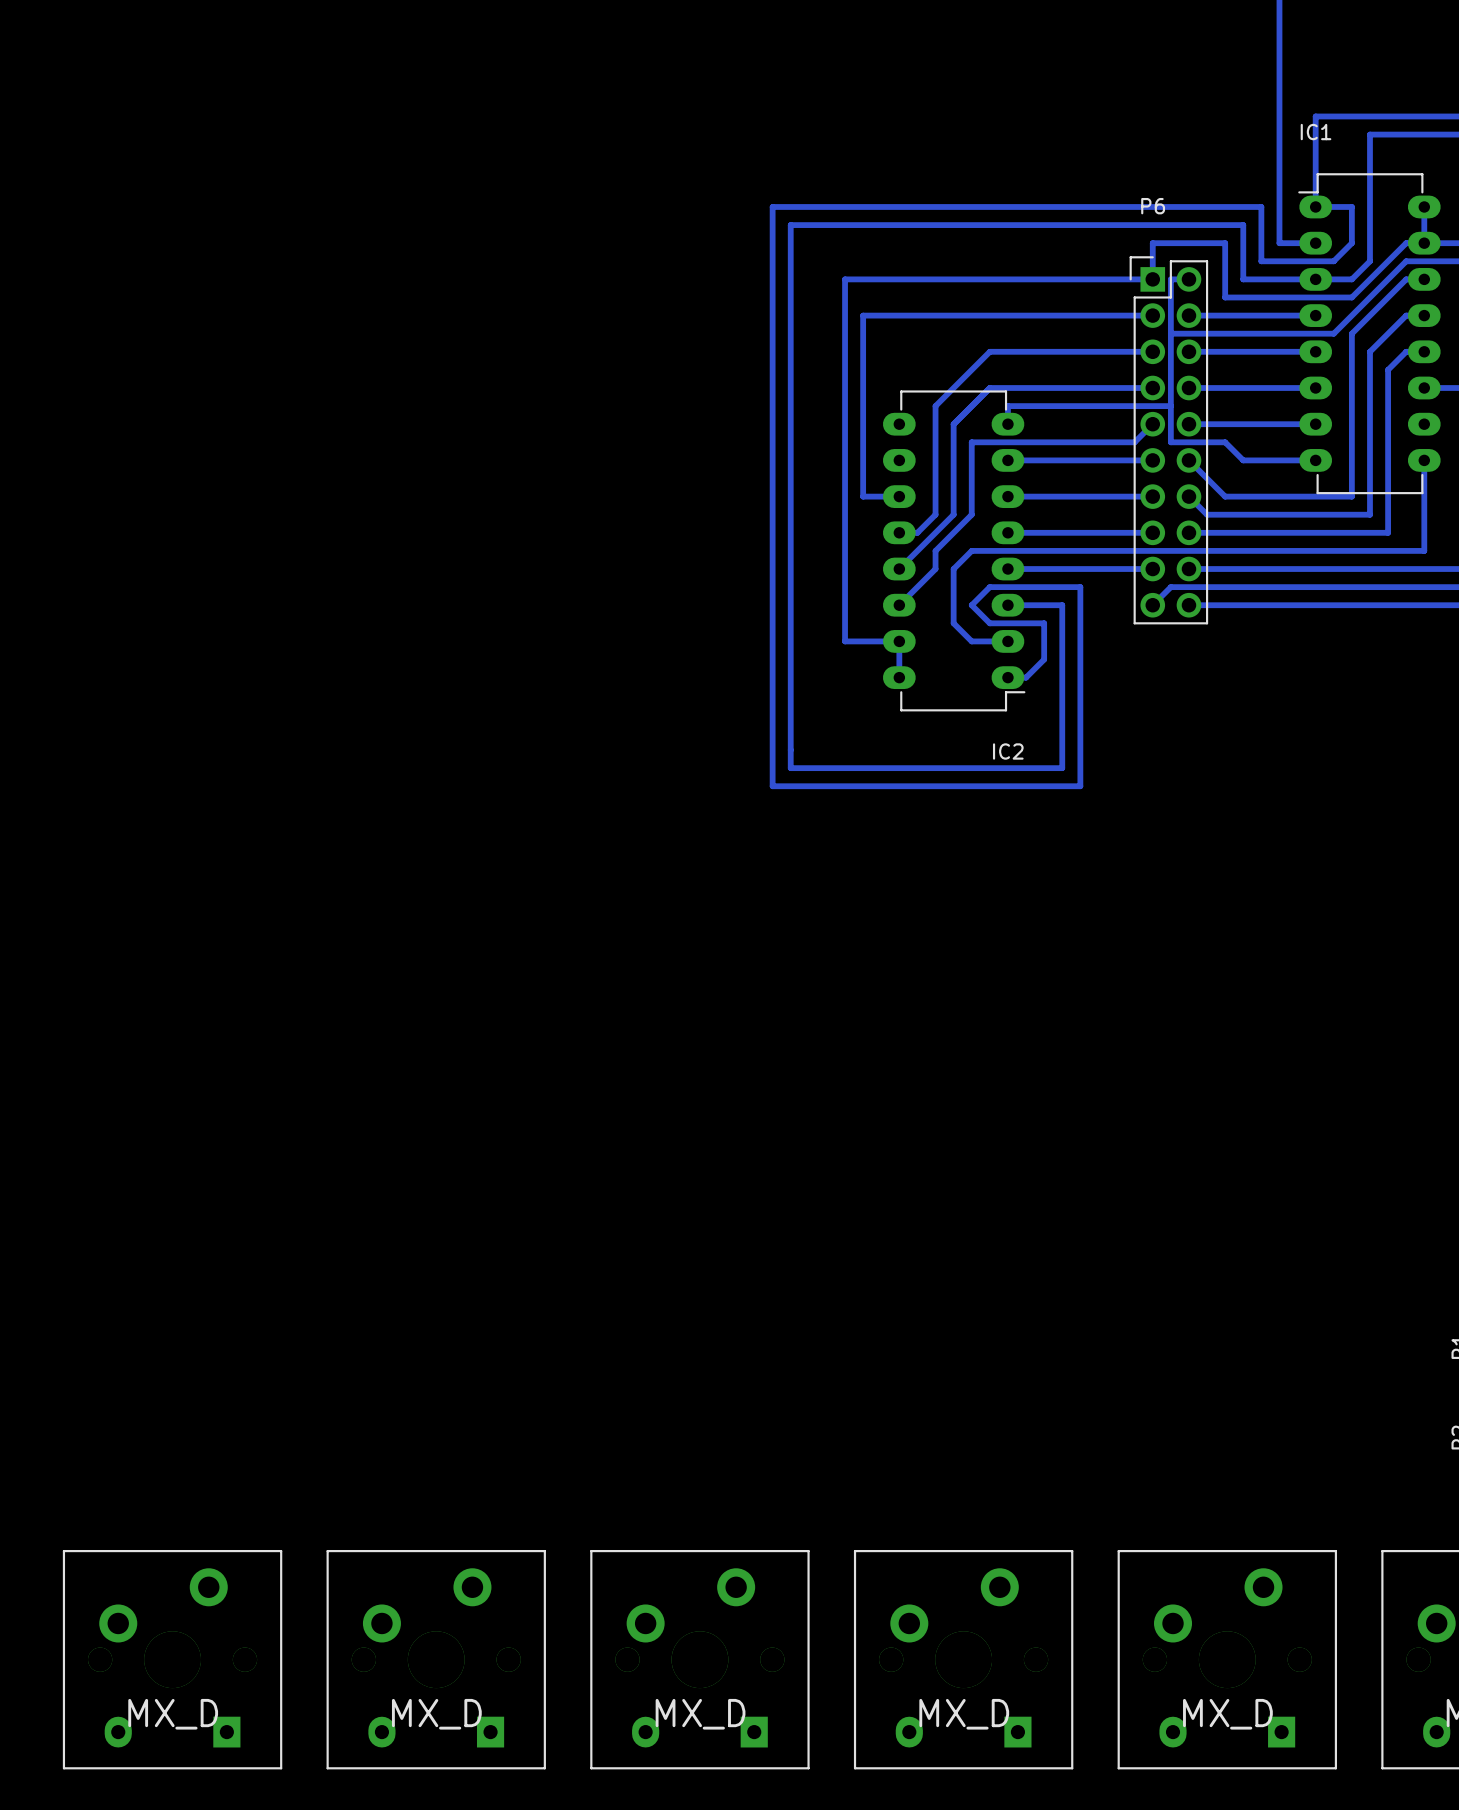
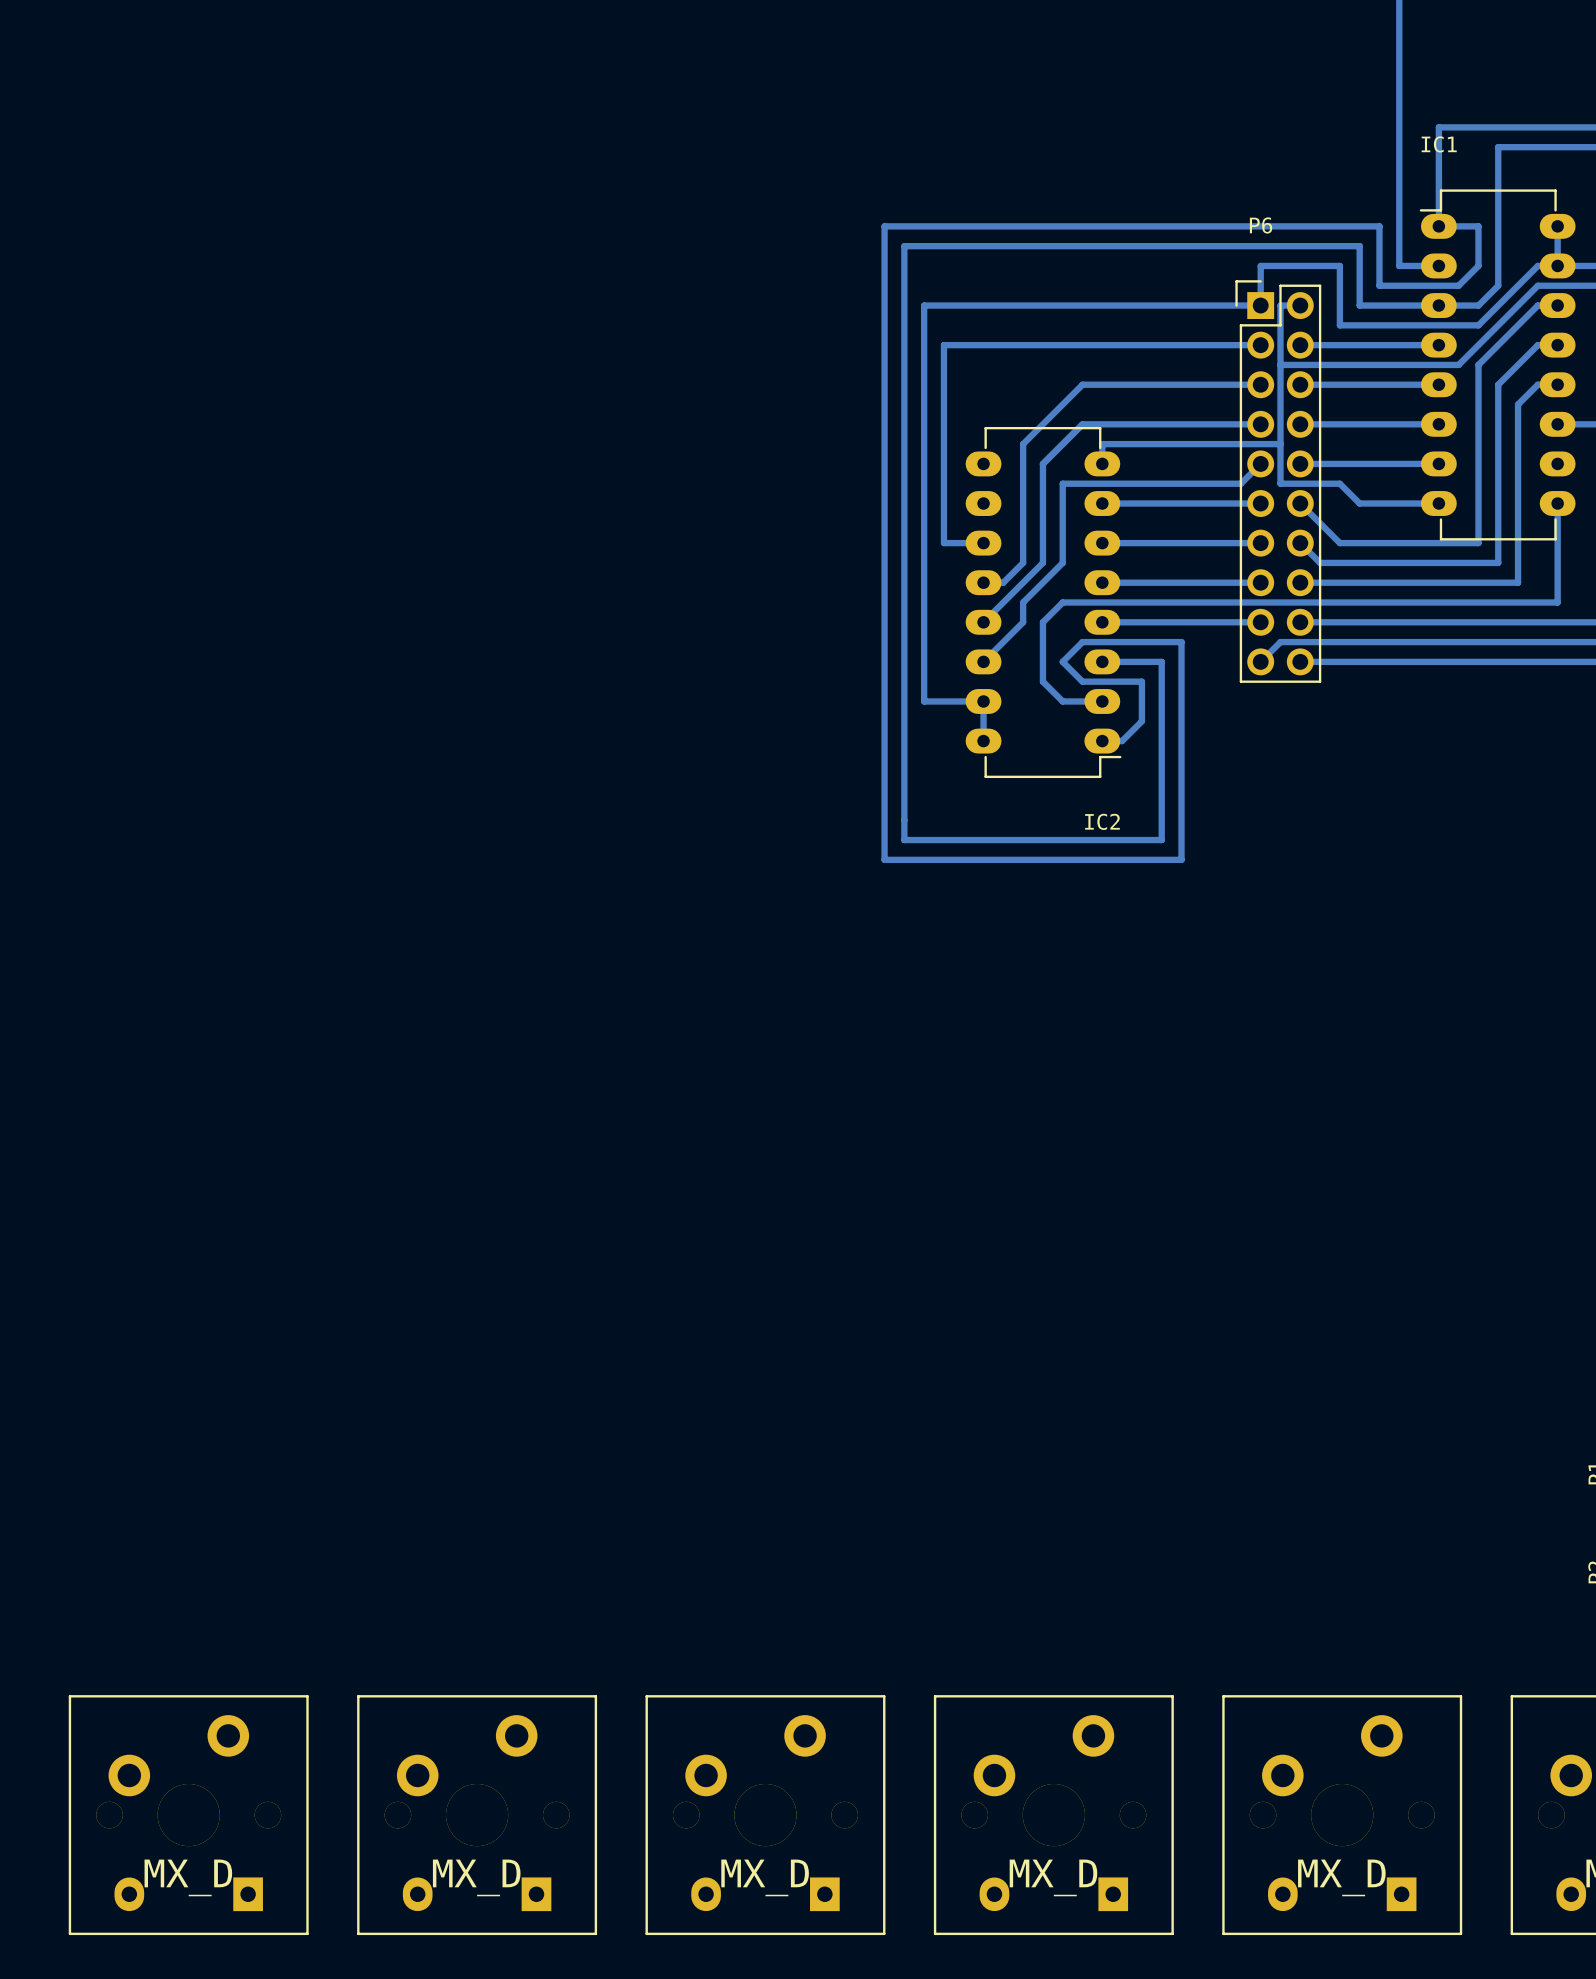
bottom track: (808, 206) (772, 206) (772, 786) (808, 786) -> (884, 226) (884, 859)
bottom track: (826, 225) (790, 225) (790, 768) (826, 768) -> (904, 246) (904, 840)

